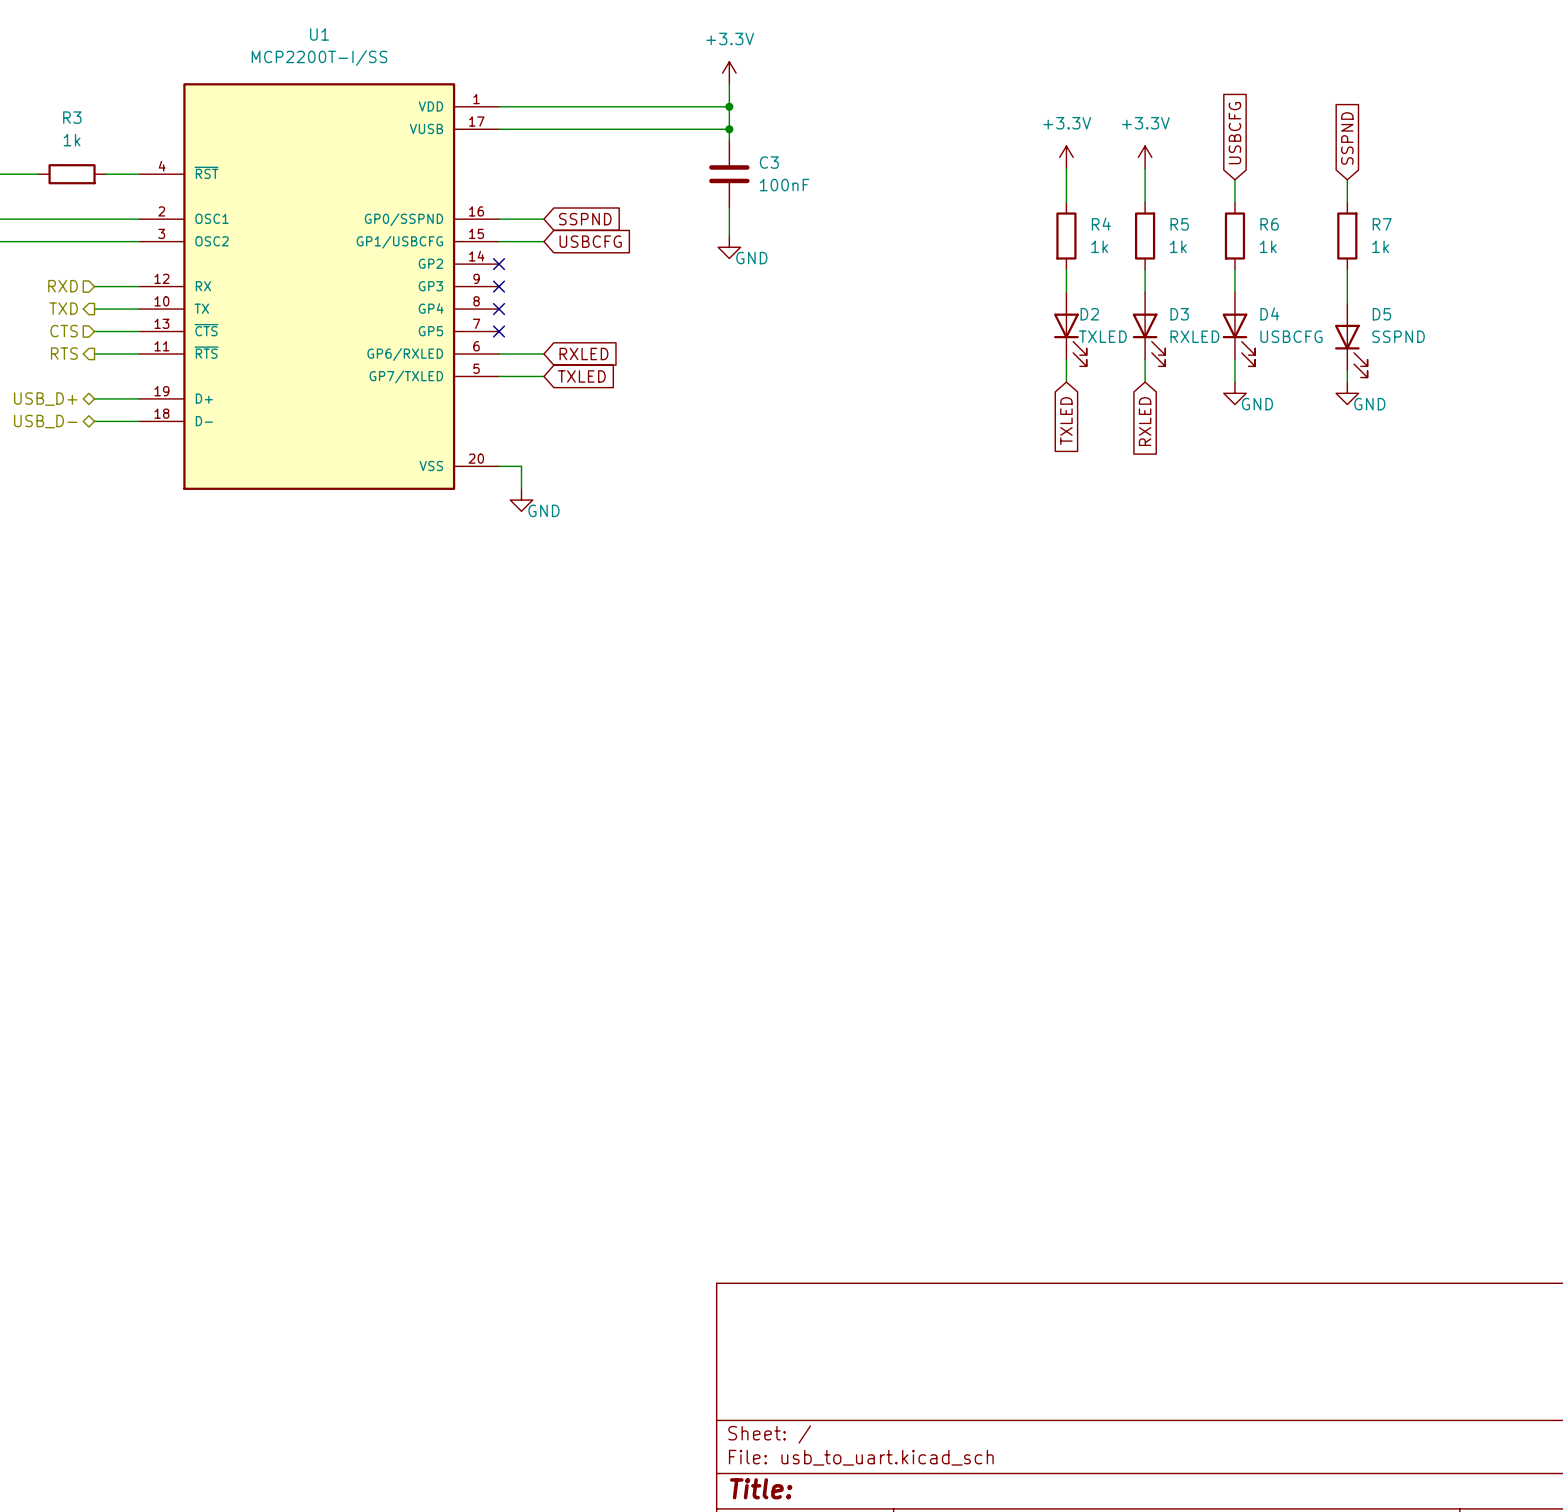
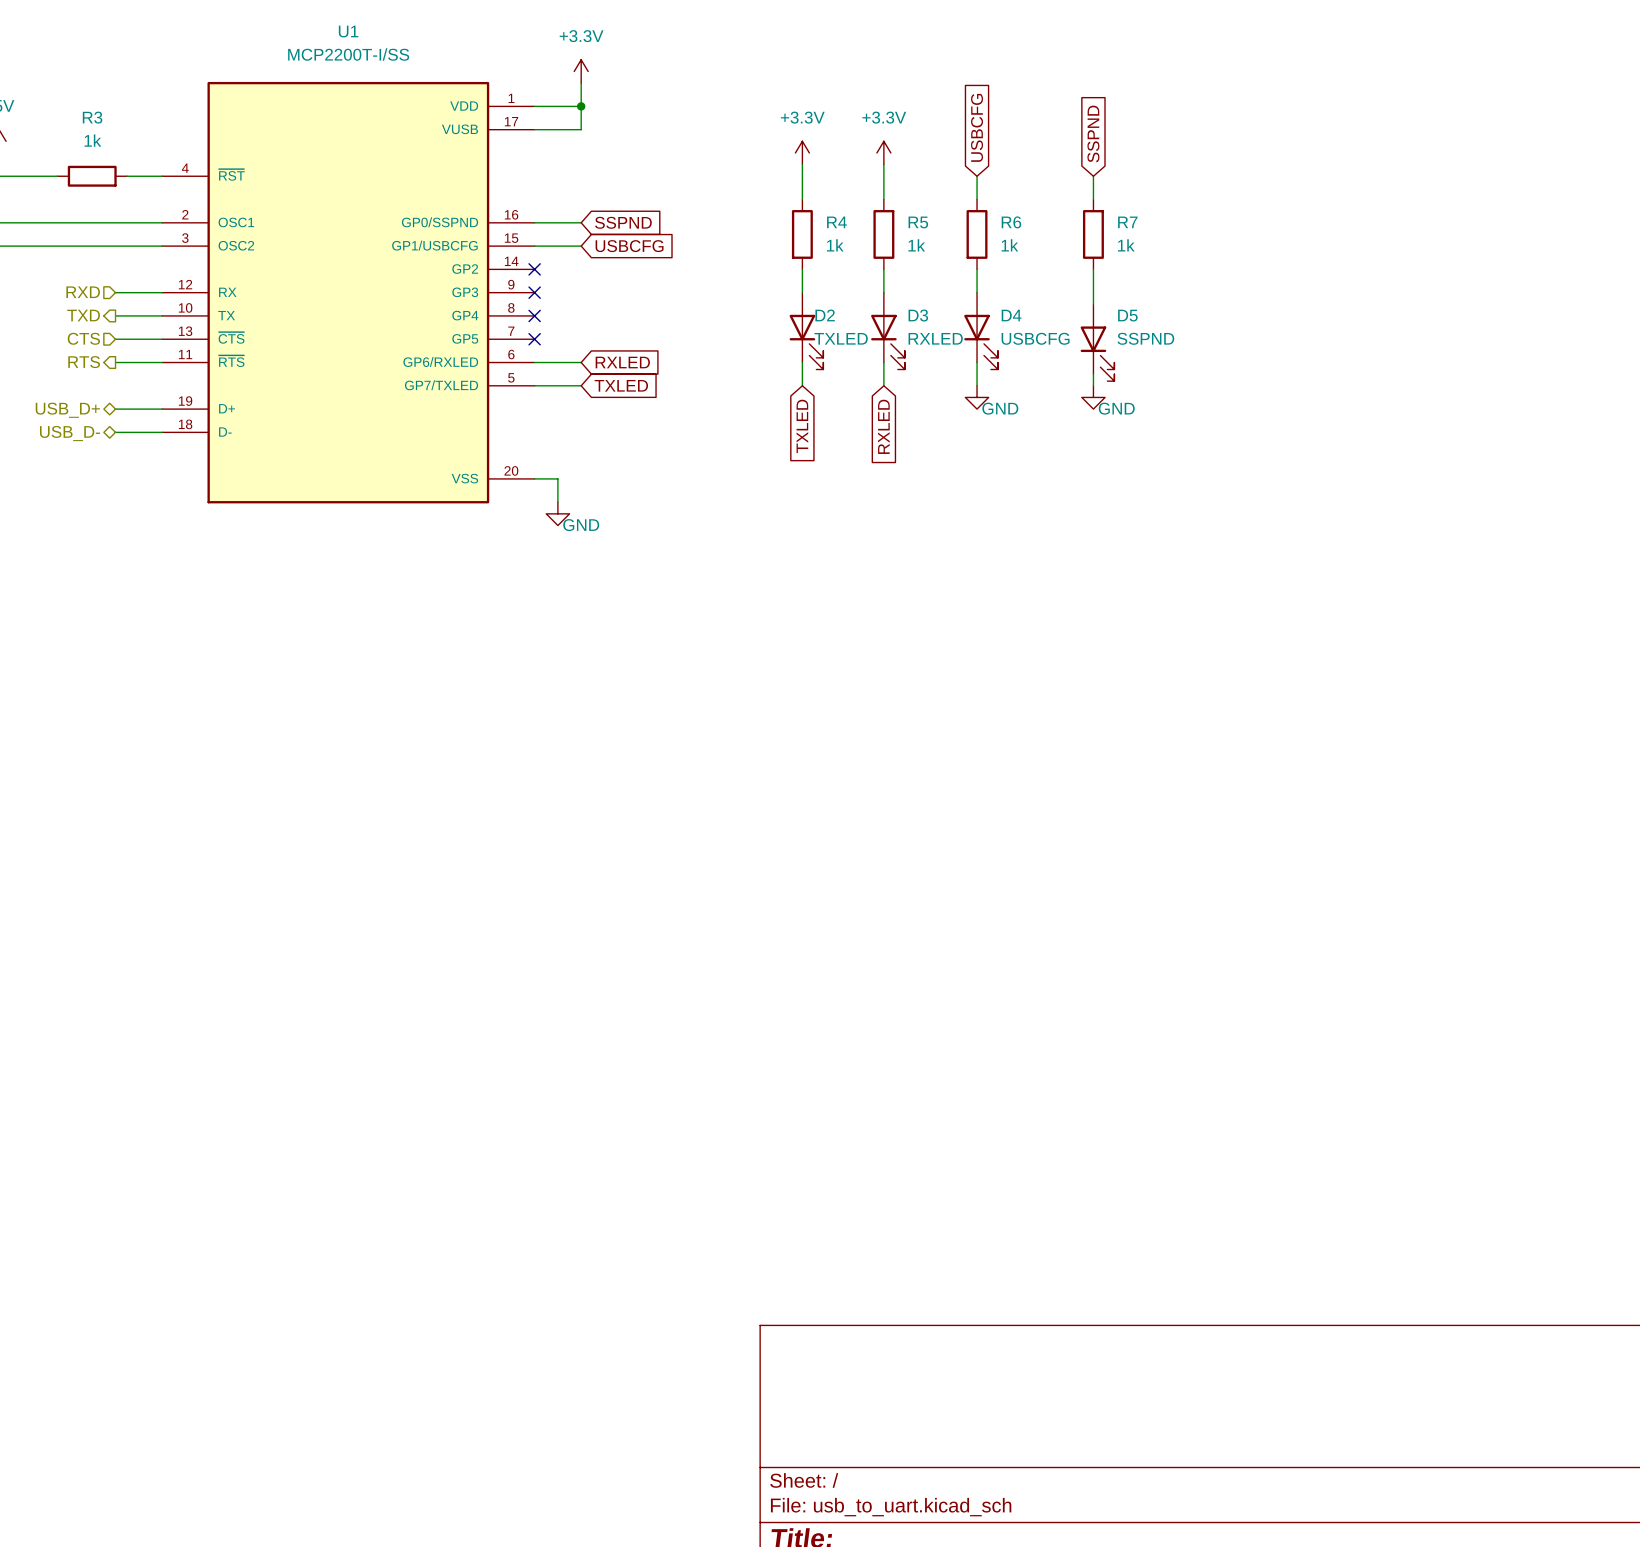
power symbol: none -> +3.3V (581, 71)
power symbol: +3.3V (729, 73) -> none
wire: (729, 84) (729, 140) -> none
wire: (543, 106) (729, 106) -> none
junction: none -> (581, 106)
junction: (729, 106) -> none
global label: none -> USBCFG (977, 127)
wire: (543, 129) (729, 129) -> (581, 129) (581, 83)
junction: (729, 129) -> none
global label: none -> SSPND (1093, 134)
global label: USBCFG (1234, 133) -> none
global label: SSPND (1347, 138) -> none
power symbol: none -> +3.3V (802, 152)
power symbol: none -> +3.3V (883, 152)
power symbol: +3.3V (1066, 157) -> none
power symbol: +3.3V (1145, 157) -> none
wire: none -> (802, 164) (802, 199)
wire: none -> (883, 164) (883, 199)
wire: (1066, 168) (1066, 202) -> (1093, 269) (1093, 304)
wire: (1145, 168) (1145, 202) -> none
C3: 100nF (729, 174) -> none
wire: none -> (977, 176) (977, 199)
wire: (1234, 179) (1234, 202) -> none
wire: (1347, 179) (1347, 202) -> none
wire: (729, 207) (729, 236) -> none
R4 position: (1066, 236) -> (802, 234)
R5 position: (1145, 236) -> (883, 234)
R6 position: (1234, 236) -> (977, 234)
R7 position: (1347, 236) -> (1093, 234)
power symbol: GND (729, 247) -> none
wire: none -> (802, 269) (802, 292)
wire: none -> (883, 269) (883, 292)
wire: (1066, 269) (1066, 292) -> (977, 269) (977, 292)
wire: (1145, 269) (1145, 292) -> (1093, 176) (1093, 199)
wire: (1234, 269) (1234, 292) -> none
wire: (1347, 269) (1347, 303) -> none
D2 position: (1070, 329) -> (806, 331)
D3 position: (1149, 329) -> (887, 331)
D4 position: (1238, 329) -> (981, 331)
D5 position: (1351, 340) -> (1097, 342)
wire: none -> (802, 362) (802, 385)
wire: none -> (883, 362) (883, 385)
wire: (1066, 359) (1066, 382) -> (977, 362) (977, 385)
wire: (1145, 359) (1145, 382) -> none
wire: (1234, 359) (1234, 382) -> none
wire: none -> (1093, 374) (1093, 385)
wire: (1347, 370) (1347, 382) -> none
power symbol: none -> GND (977, 397)
power symbol: none -> GND (1093, 397)
power symbol: GND (1234, 393) -> none
power symbol: GND (1347, 393) -> none
global label: none -> TXLED (802, 426)
global label: none -> RXLED (883, 426)
global label: TXLED (1066, 421) -> none
global label: RXLED (1145, 421) -> none

